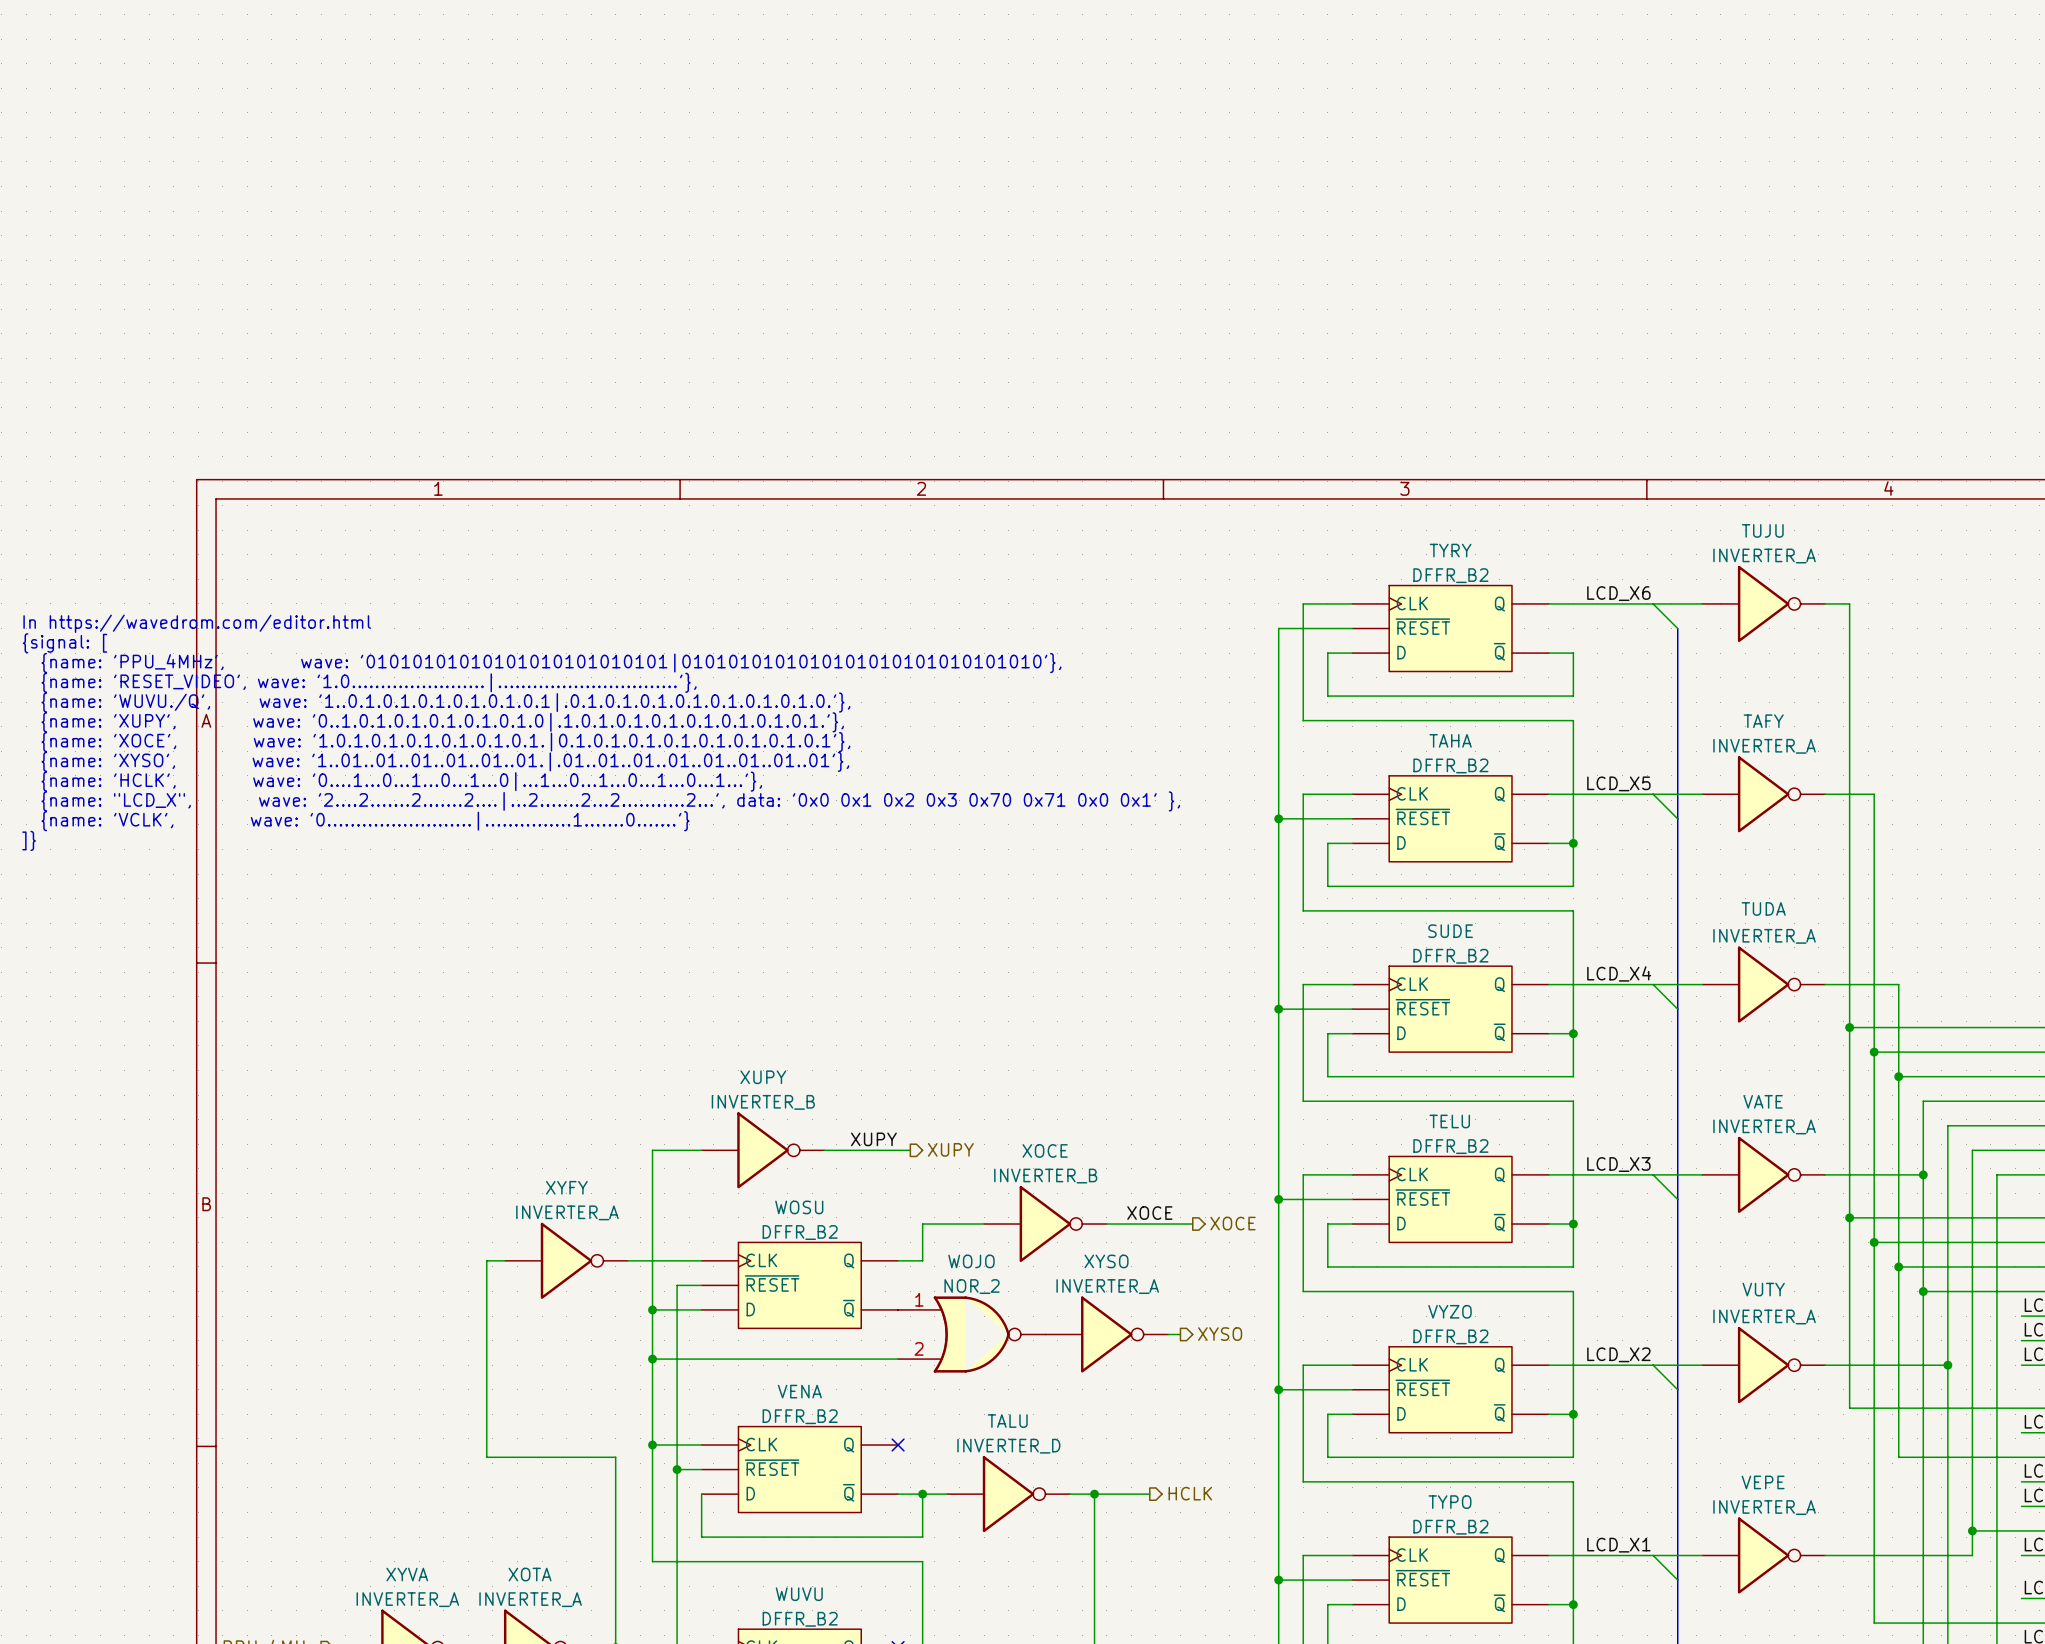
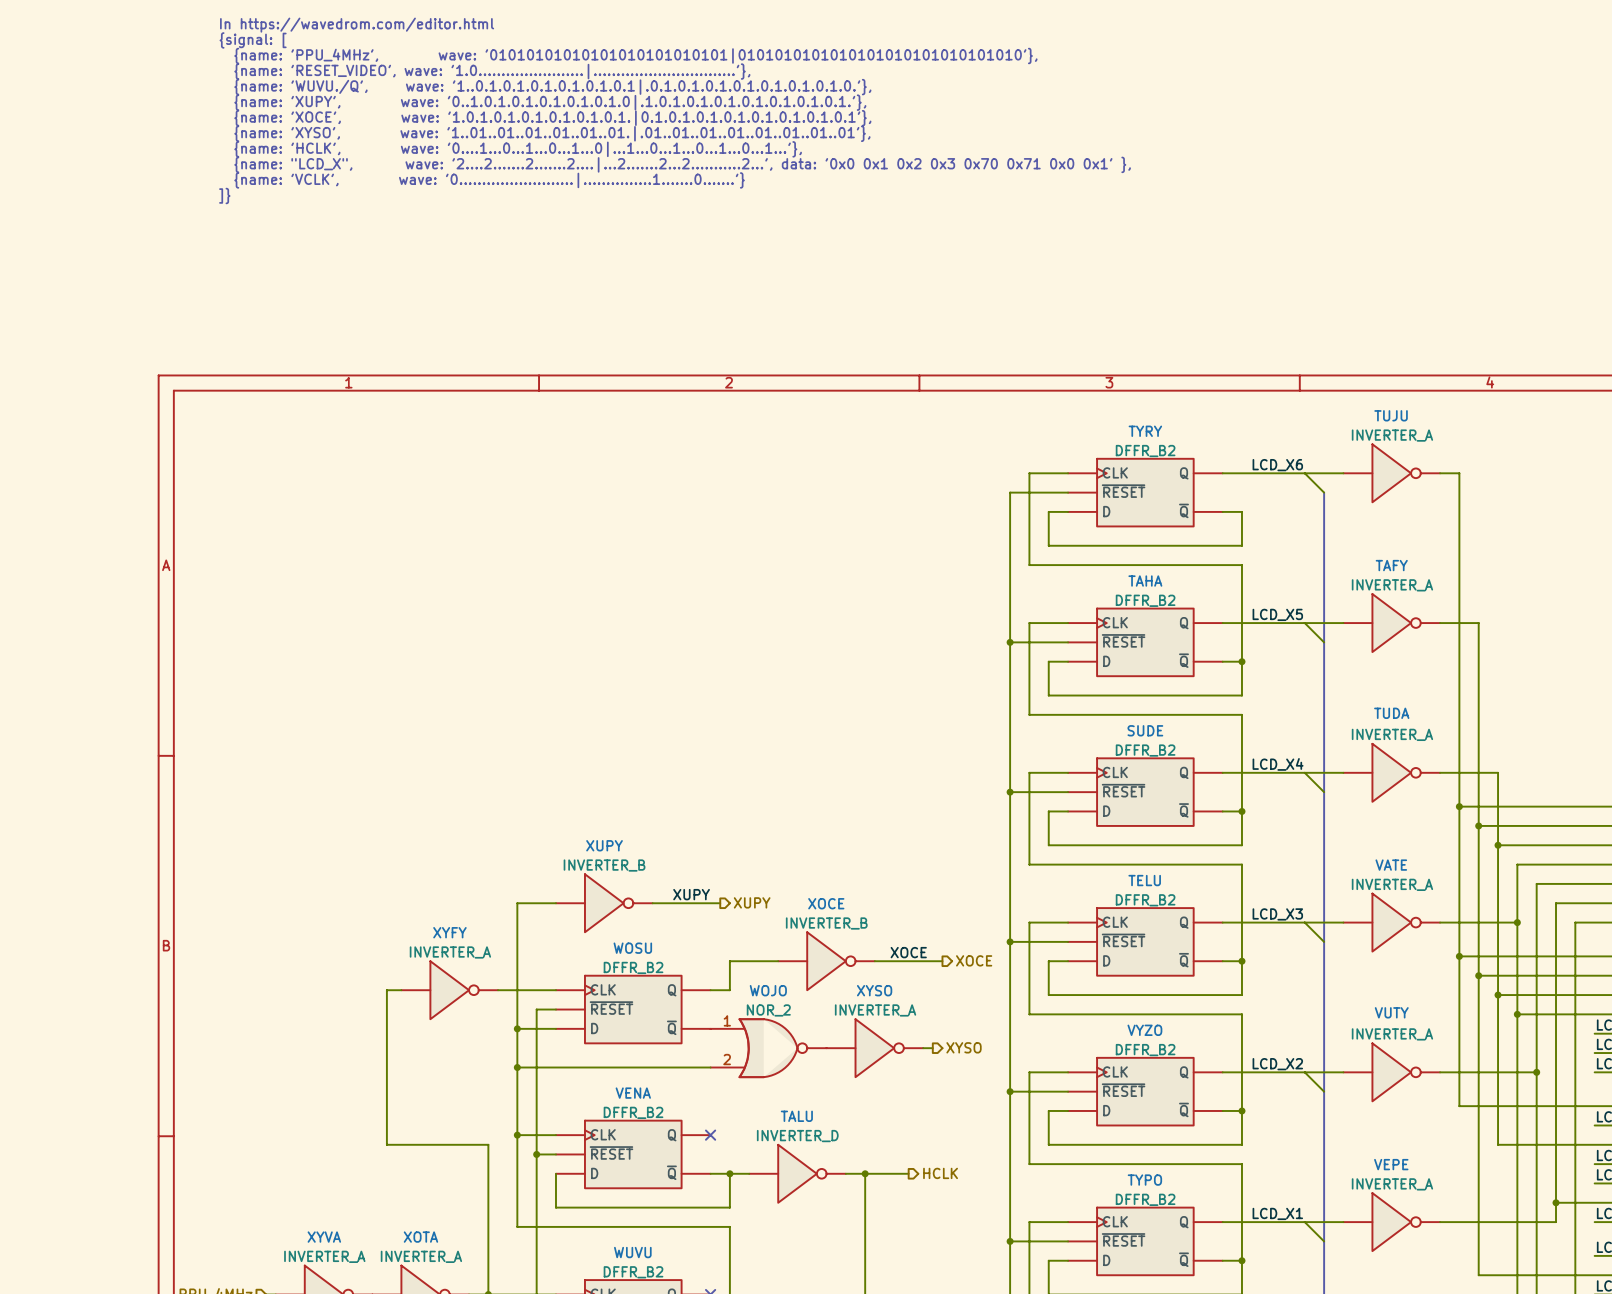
text: none -> In https://wavedrom.com/editor.html (357, 25)
text: none -> {signal: [ (253, 40)
text: none -> {name: 'PPU_4MHz', wave: '01010101010101010101010101|0101010101010101010101010101010'}, (635, 55)
text: none -> {name: 'RESET_VIDEO', wave: '1.0.......................|...............................'}, (492, 71)
text: none -> {name: 'WUVU./Q', wave: '1..0.1.0.1.0.1.0.1.0.1.0.1|.0.1.0.1.0.1.0.1.0.1.0.1.0.1.0.'}, (552, 87)
text: none -> {name: 'XUPY', wave: '0..1.0.1.0.1.0.1.0.1.0.1.0|.1.0.1.0.1.0.1.0.1.0.1.0.1.0.1.'}, (550, 102)
text: none -> {name: 'XOCE', wave: '1.0.1.0.1.0.1.0.1.0.1.0.1.|0.1.0.1.0.1.0.1.0.1.0.1.0.1.0.1'}, (552, 118)
text: none -> {name: 'XYSO', wave: '1..01..01..01..01..01..01.|.01..01..01..01..01..01..01..01'}, (552, 133)
text: none -> {name: 'HCLK', wave: '0....1...0...1...0...1...0|...1...0...1...0...1...0...1...'}, (518, 149)
text: none -> {name: "LCD_X", wave: '2....2.......2.......2....|...2.......2...2...........2...', data: '0x0 0x1 0x2 0x3 0x70 0x71 0x0 0x1' }, (682, 164)
text: none -> {name: 'VCLK', wave: '0.........................|...............1.......0.......'} (489, 180)
text: none -> ]} (224, 196)
text: In https://wavedrom.com/editor.html (197, 623) -> none
text: {signal: [ (65, 643) -> none
text: {name: 'PPU_4MHz', wave: '01010101010101010101010101|0101010101010101010101010101010'}, (551, 663) -> none
text: {name: 'RESET_VIDEO', wave: '1.0.......................|...............................'}, (369, 682) -> none
text: {name: 'WUVU./Q', wave: '1..0.1.0.1.0.1.0.1.0.1.0.1|.0.1.0.1.0.1.0.1.0.1.0.1.0.1.0.'}, (445, 702) -> none
text: {name: 'XUPY', wave: '0..1.0.1.0.1.0.1.0.1.0.1.0|.1.0.1.0.1.0.1.0.1.0.1.0.1.0.1.'}, (442, 722) -> none
text: {name: 'XOCE', wave: '1.0.1.0.1.0.1.0.1.0.1.0.1.|0.1.0.1.0.1.0.1.0.1.0.1.0.1.0.1'}, (445, 742) -> none
text: {name: 'XYSO', wave: '1..01..01..01..01..01..01.|.01..01..01..01..01..01..01..01'}, (445, 761) -> none
text: {name: 'HCLK', wave: '0....1...0...1...0...1...0|...1...0...1...0...1...0...1...'}, (401, 781) -> none
text: {name: "LCD_X", wave: '2....2.......2.......2....|...2.......2...2...........2...', data: '0x0 0x1 0x2 0x3 0x70 0x71 0x0 0x1' }, (610, 801) -> none
text: {name: 'VCLK', wave: '0.........................|...............1.......0.......'} (365, 821) -> none
text: ]} (29, 840) -> none

